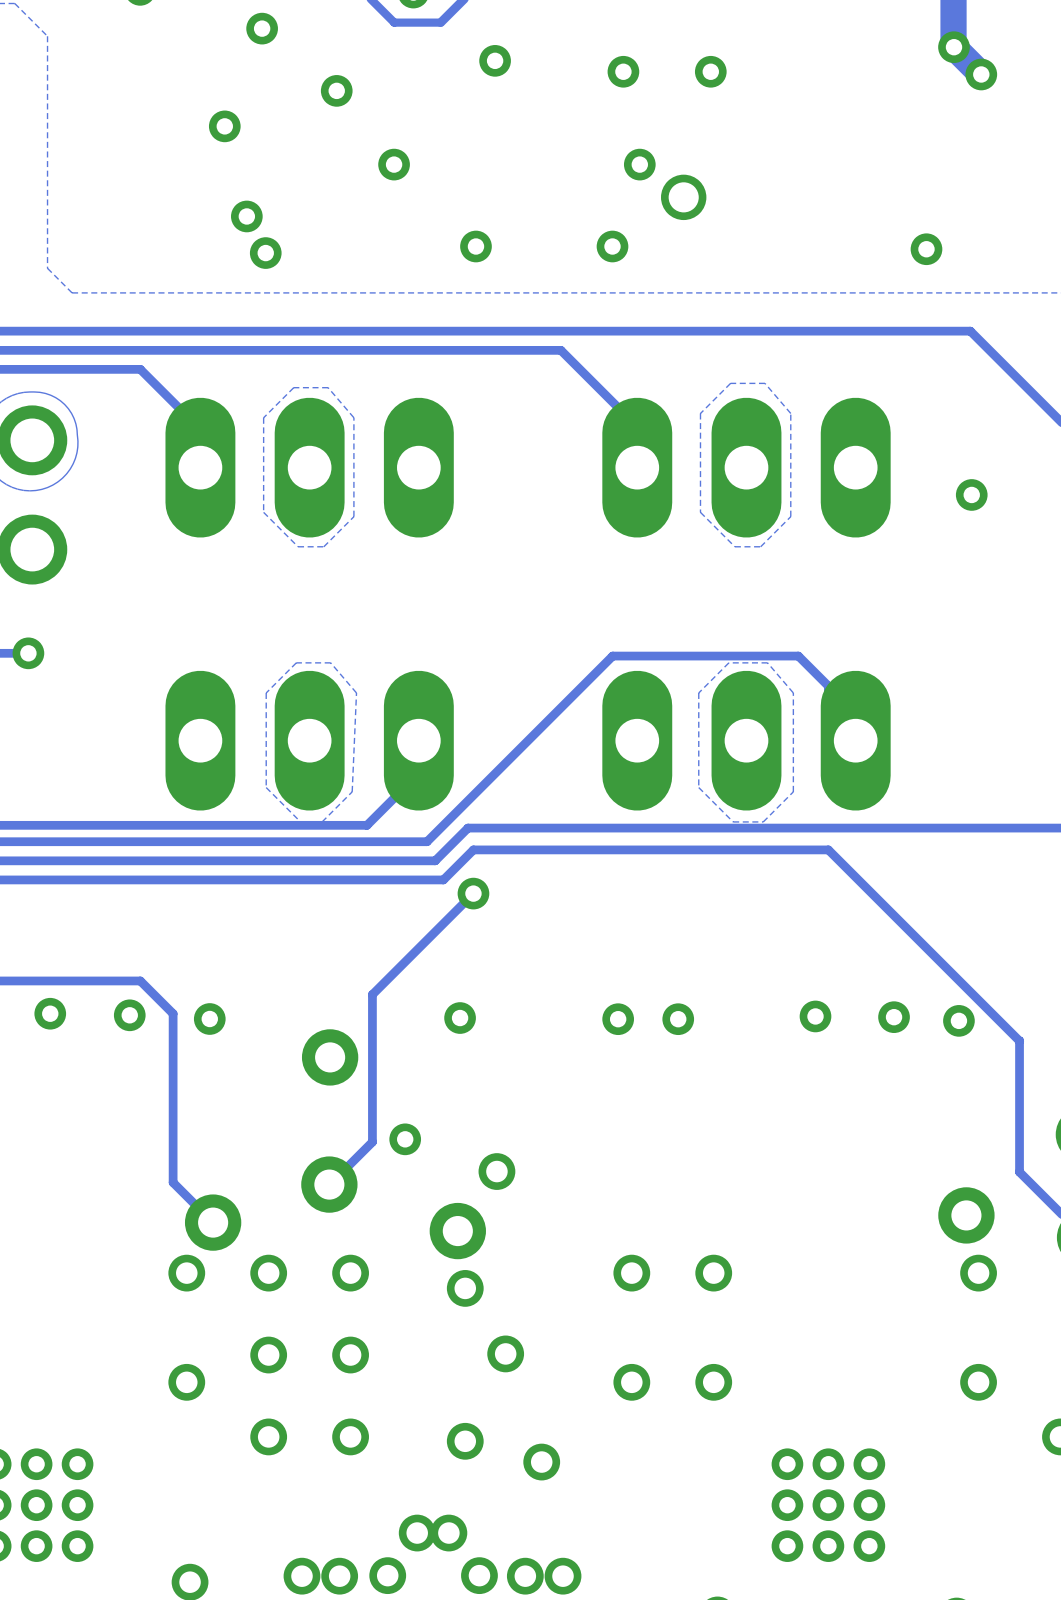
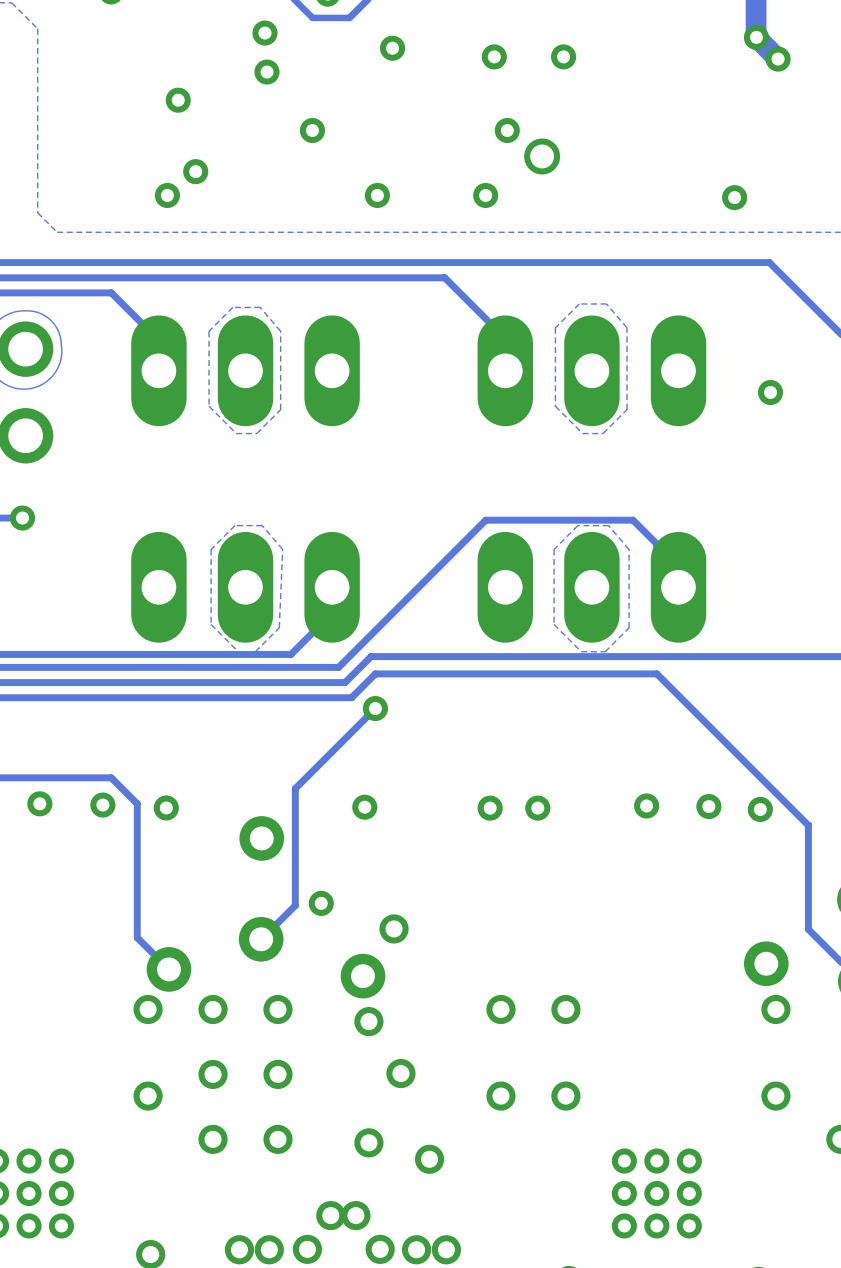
via position: (262, 28) -> (265, 33)
via position: (265, 253) -> (167, 195)

